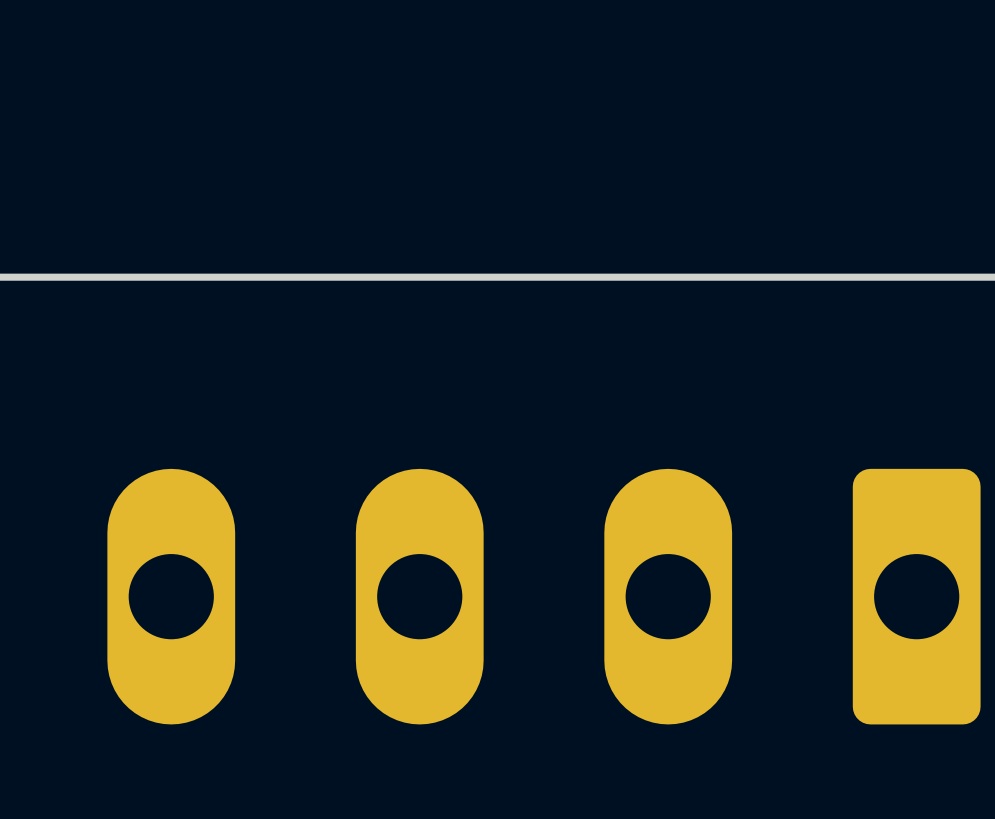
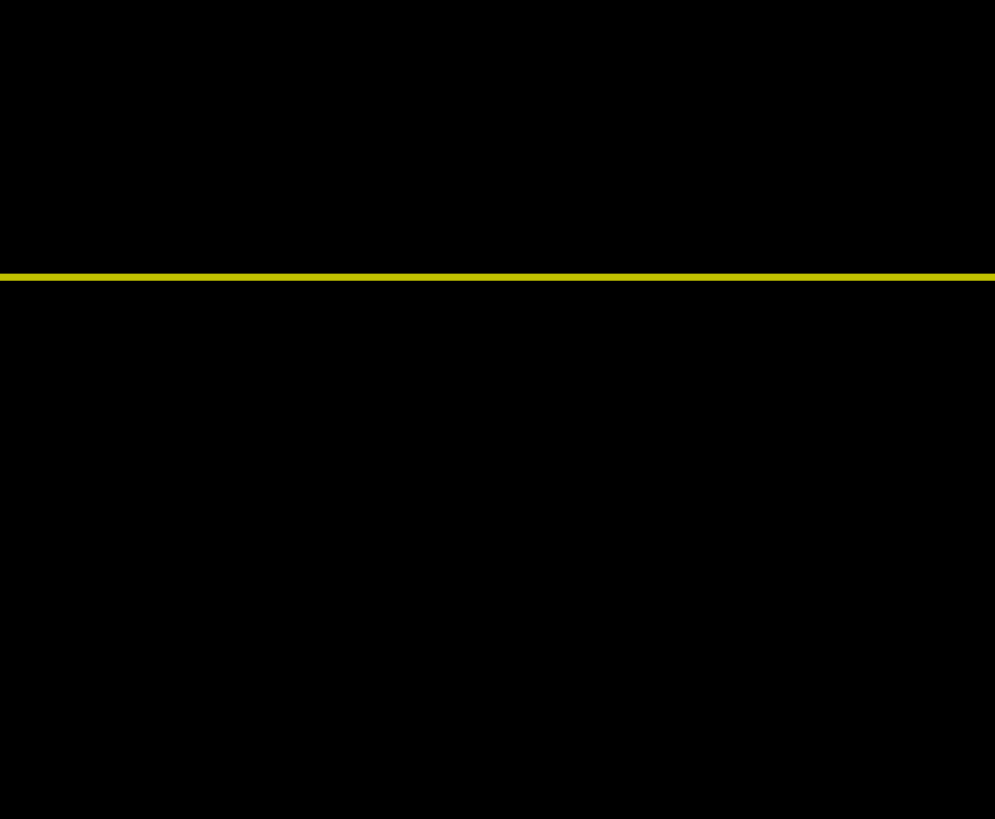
part: (543, 596) -> none

